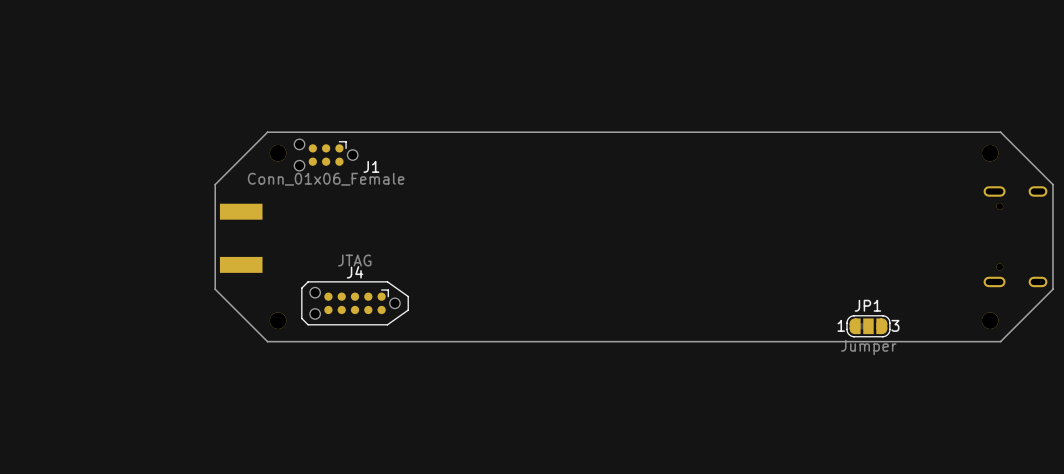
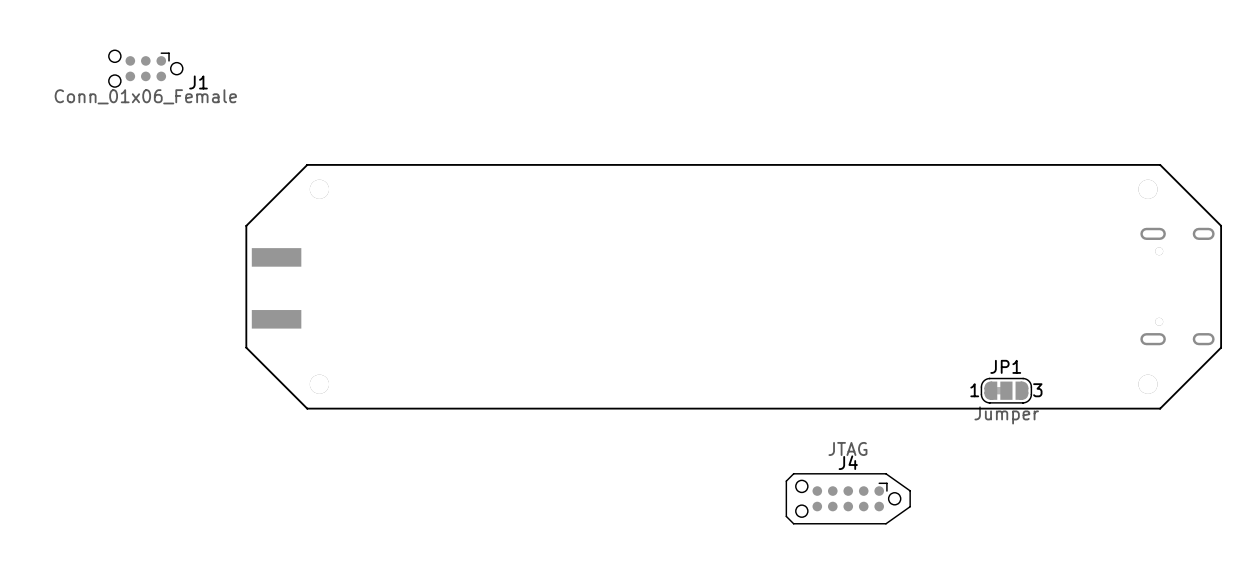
J1 position: (326, 155) -> (145, 68)
J4 position: (355, 303) -> (848, 498)

